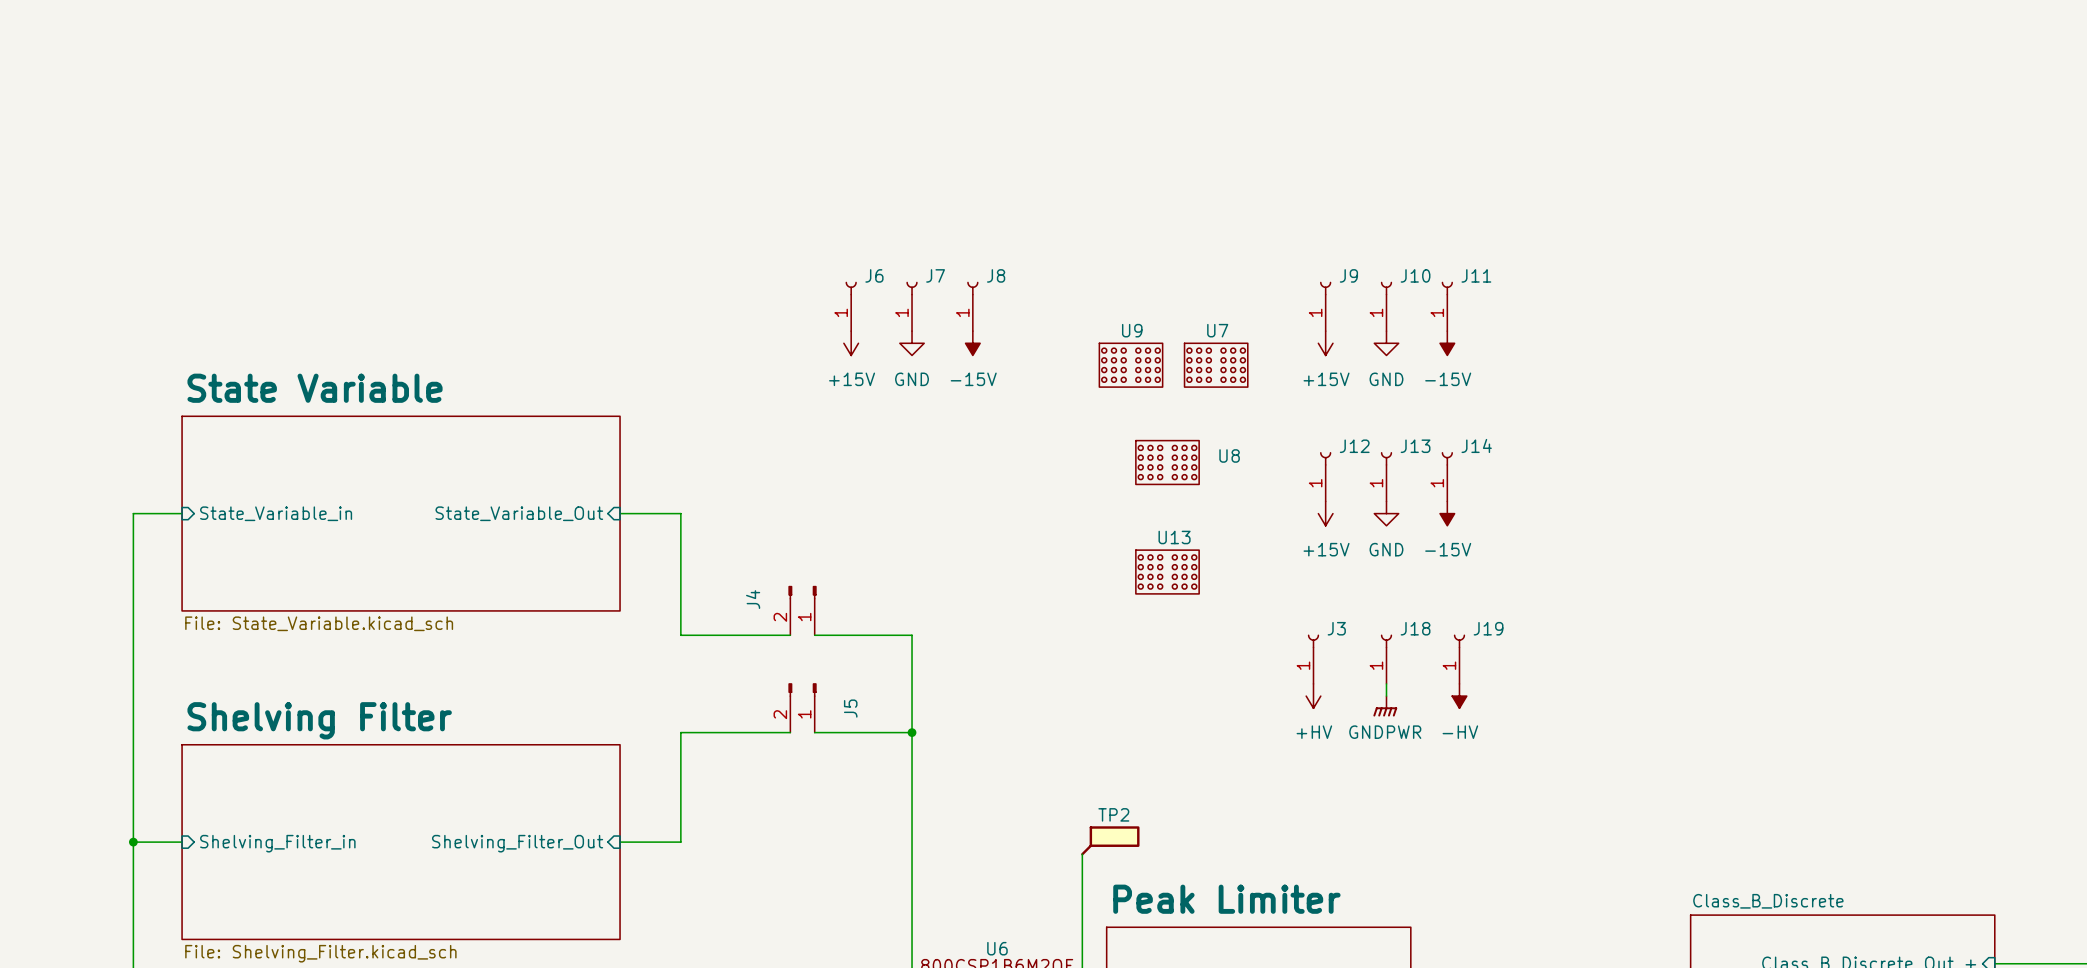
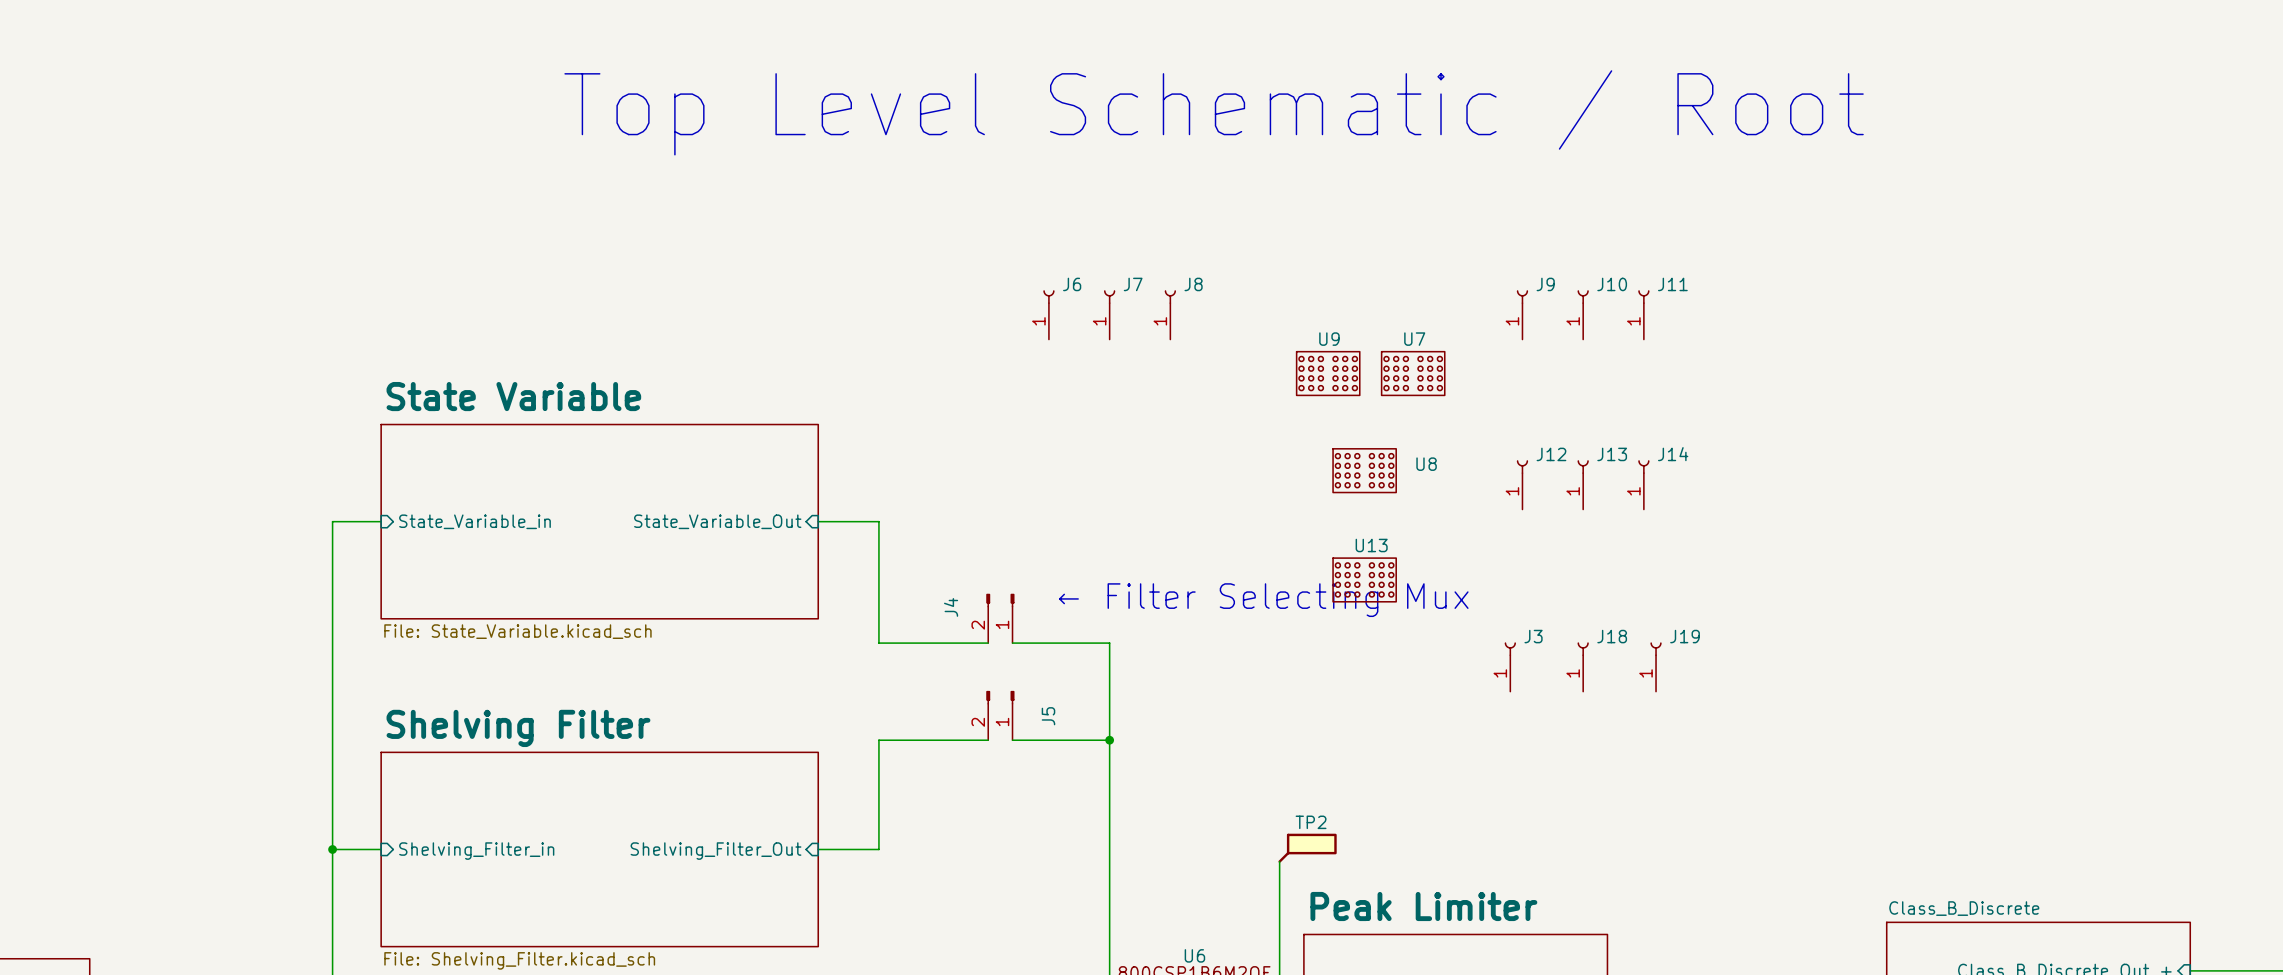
text: none -> Top Level Schematic / Root (1214, 112)
power symbol: +15V (851, 343) -> none
power symbol: GND (912, 343) -> none
power symbol: -15V (972, 343) -> none
power symbol: +15V (1325, 343) -> none
power symbol: GND (1386, 343) -> none
power symbol: -15V (1447, 343) -> none
power symbol: +15V (1325, 513) -> none
power symbol: GND (1386, 513) -> none
power symbol: -15V (1447, 513) -> none
text: none -> ← Filter Selecting Mux (1263, 600)
wire: (1386, 683) (1386, 696) -> none
power symbol: +HV (1313, 696) -> none
power symbol: -HV (1459, 696) -> none
power symbol: GNDPWR (1385, 706) -> none

